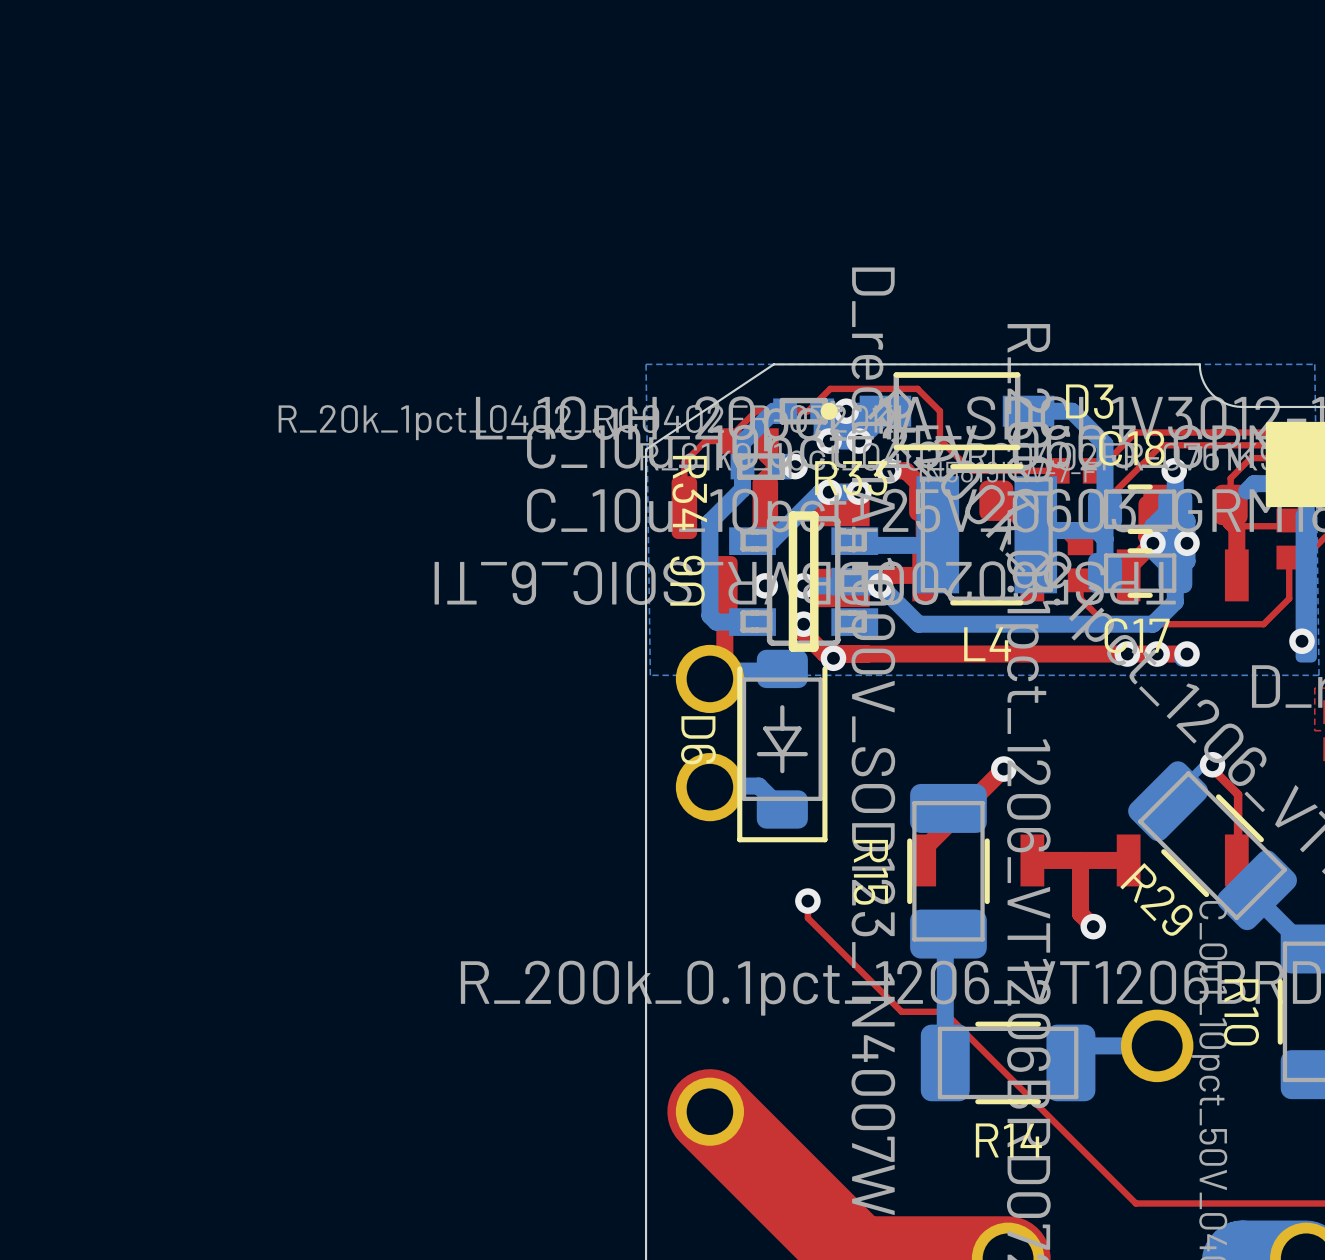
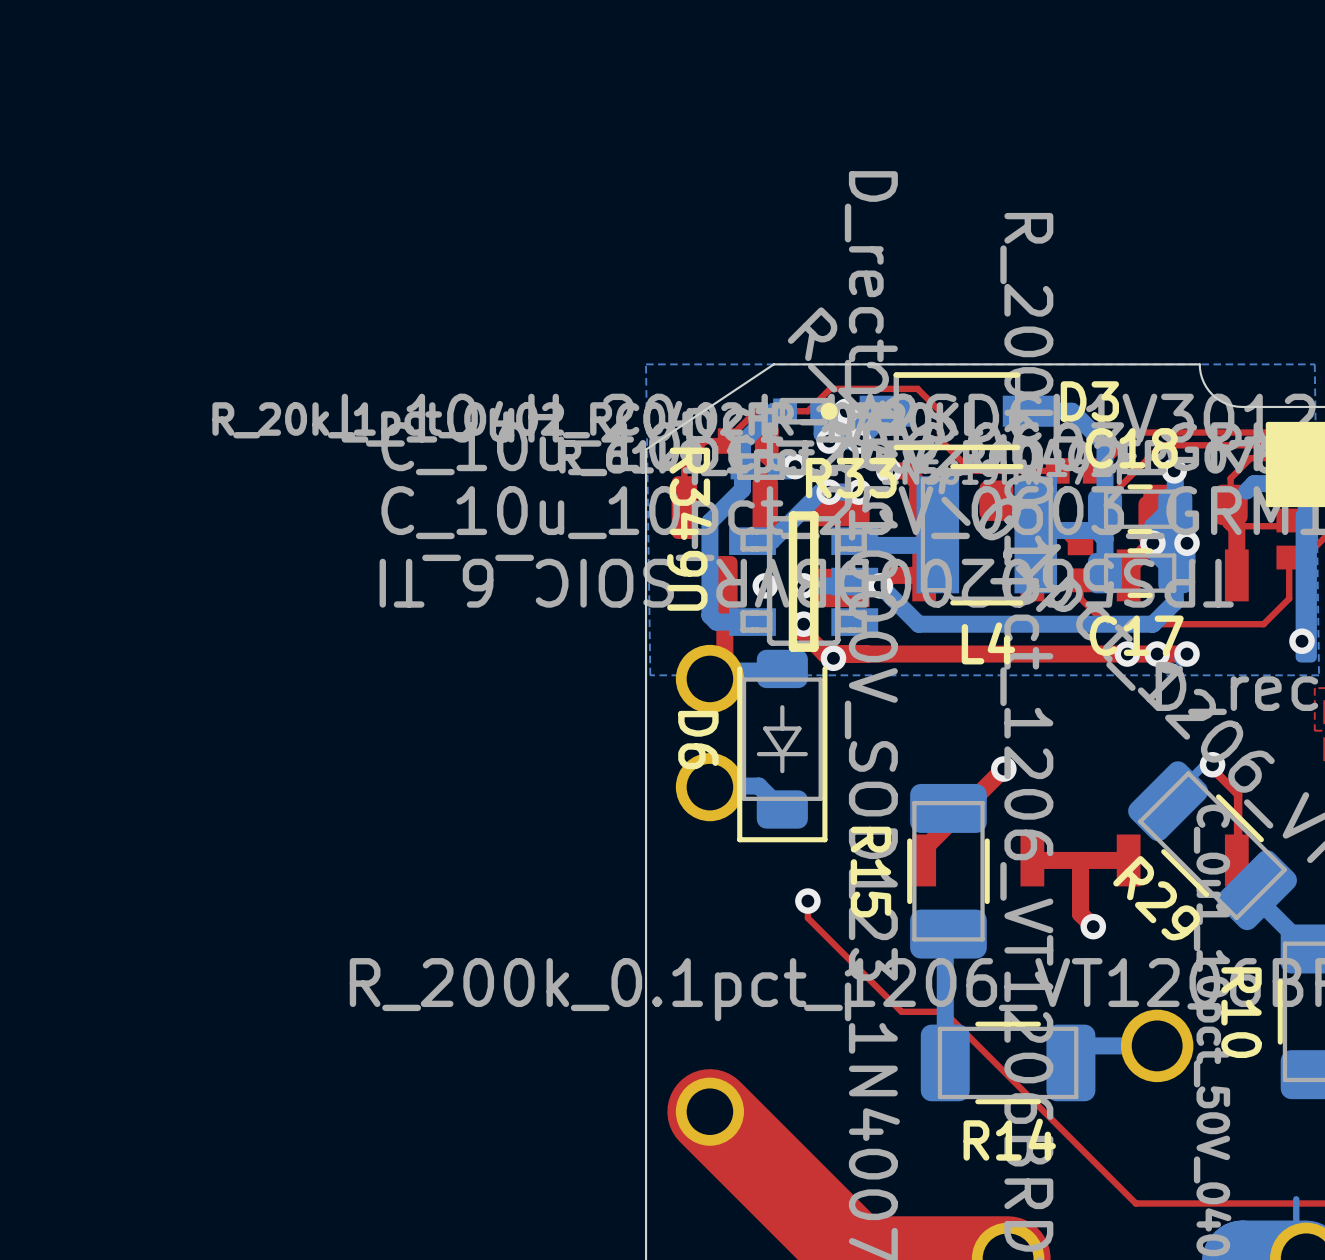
bottom track: none -> (1296, 1199) (1296, 1248)

